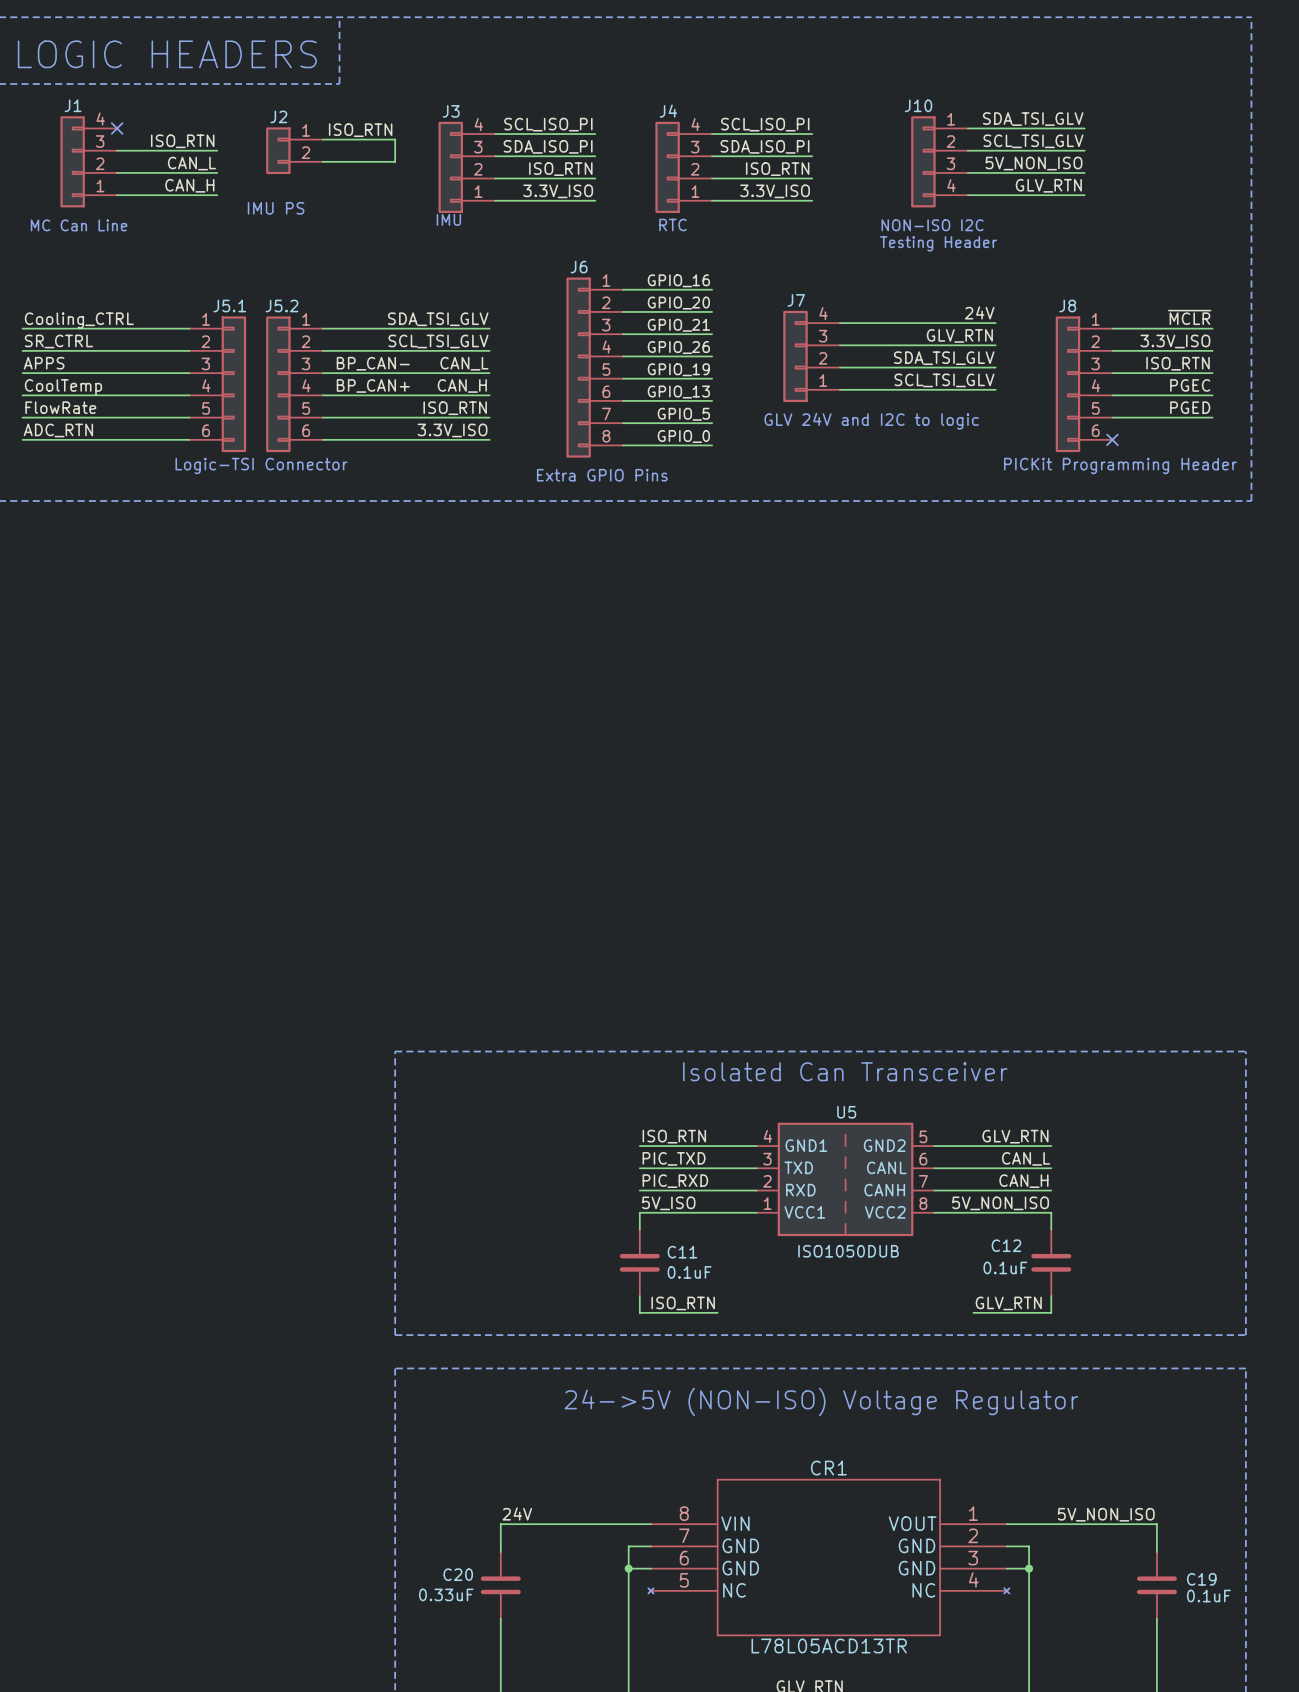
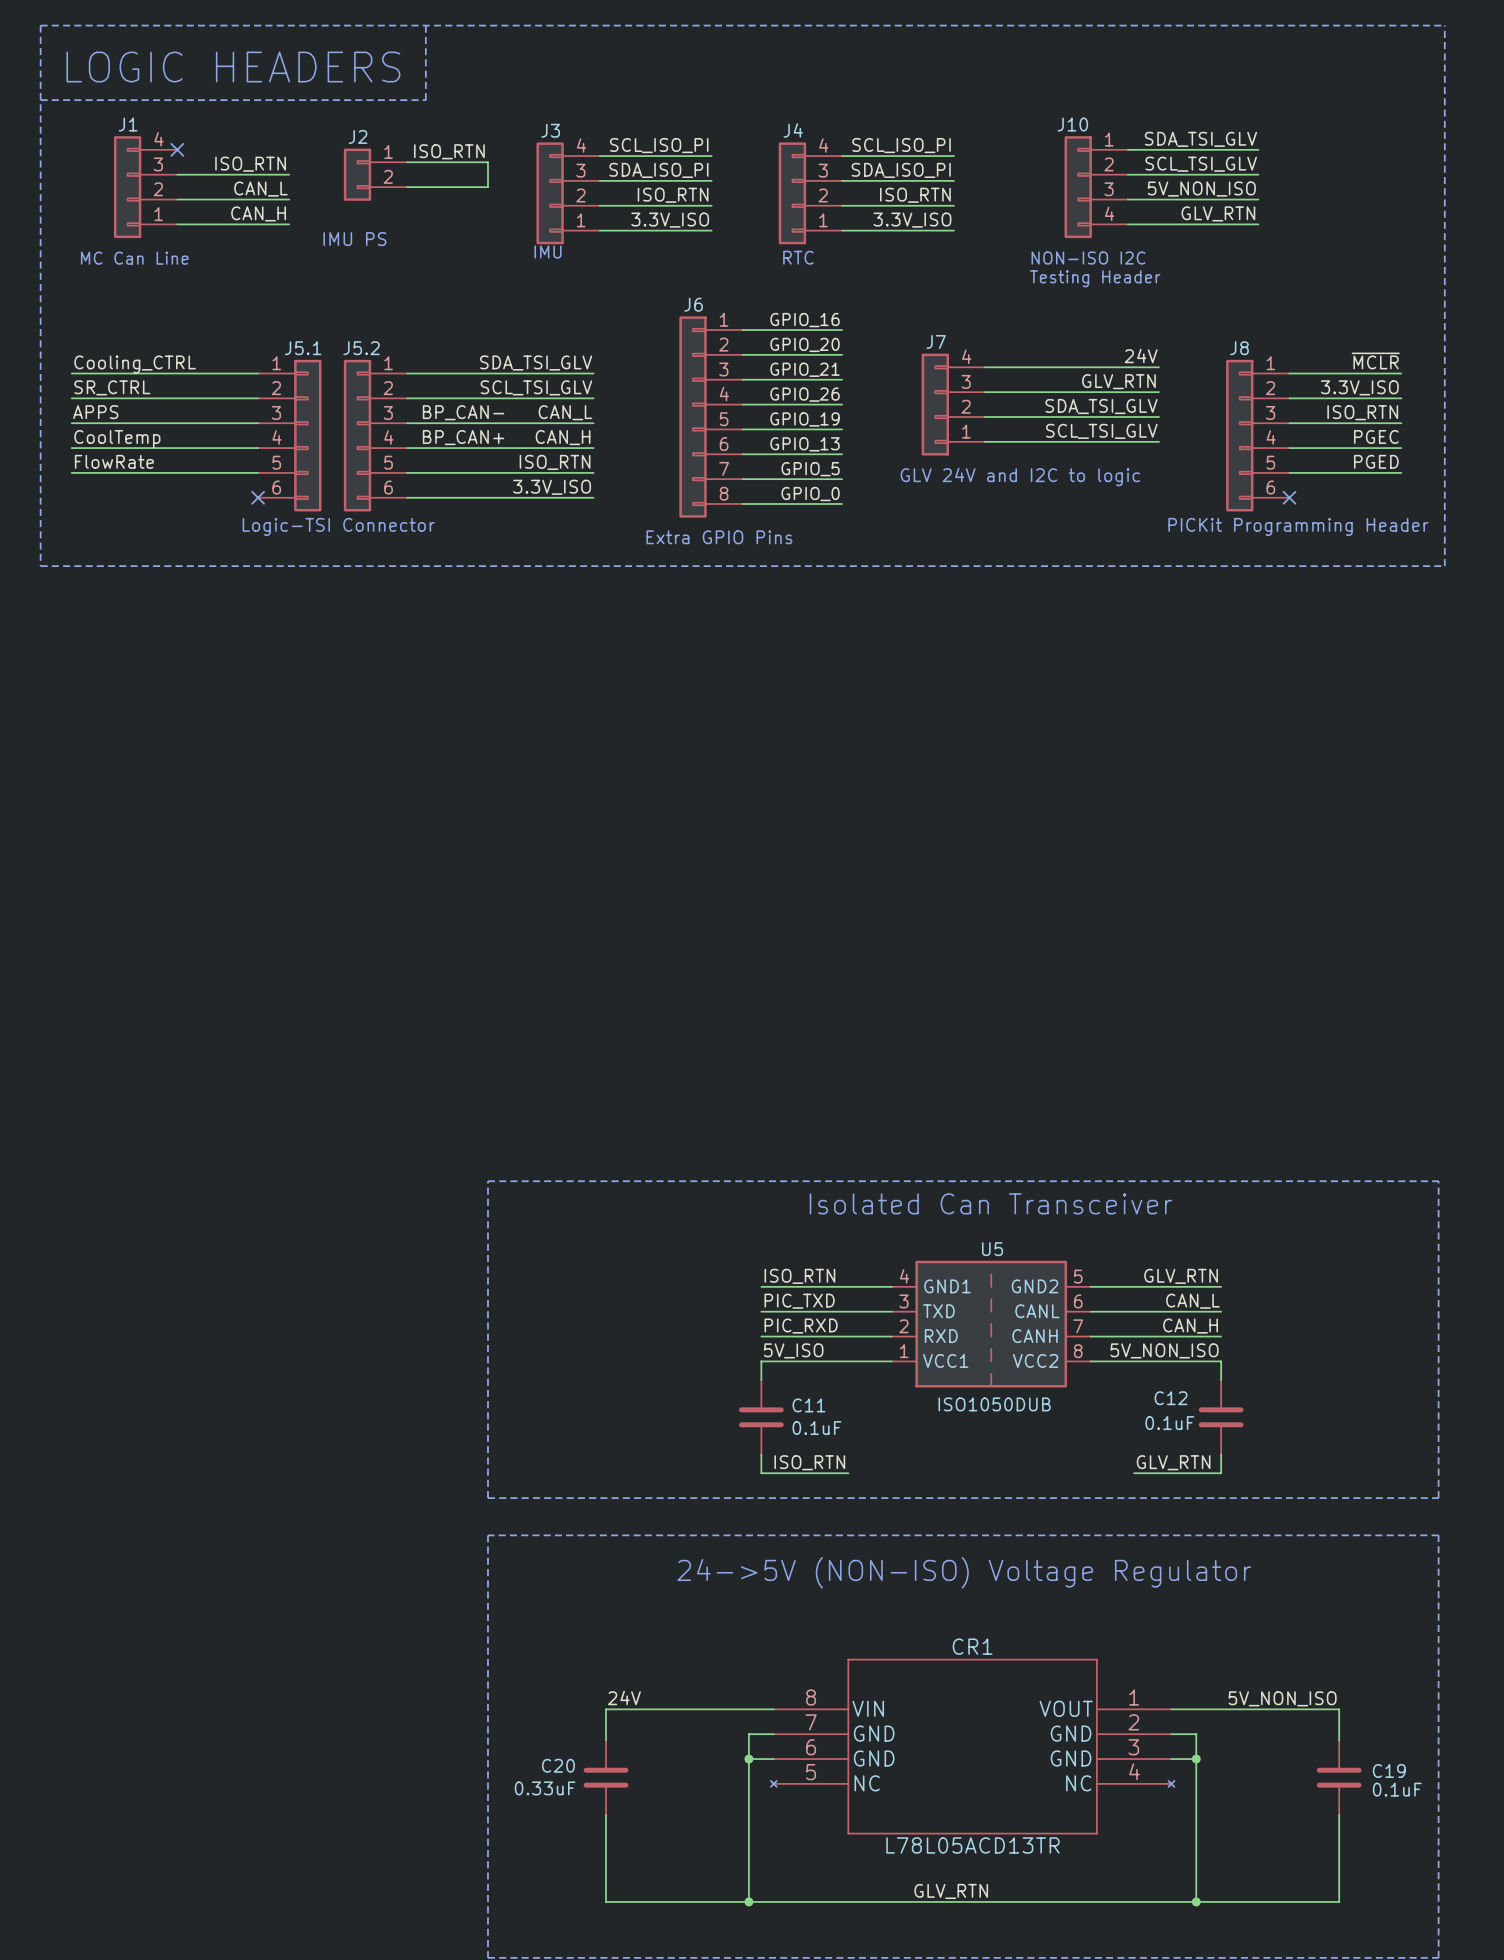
label: ADC_RTN (58, 430) -> none
wire: (22, 439) (189, 439) -> none
no-connect mark: none -> (258, 497)

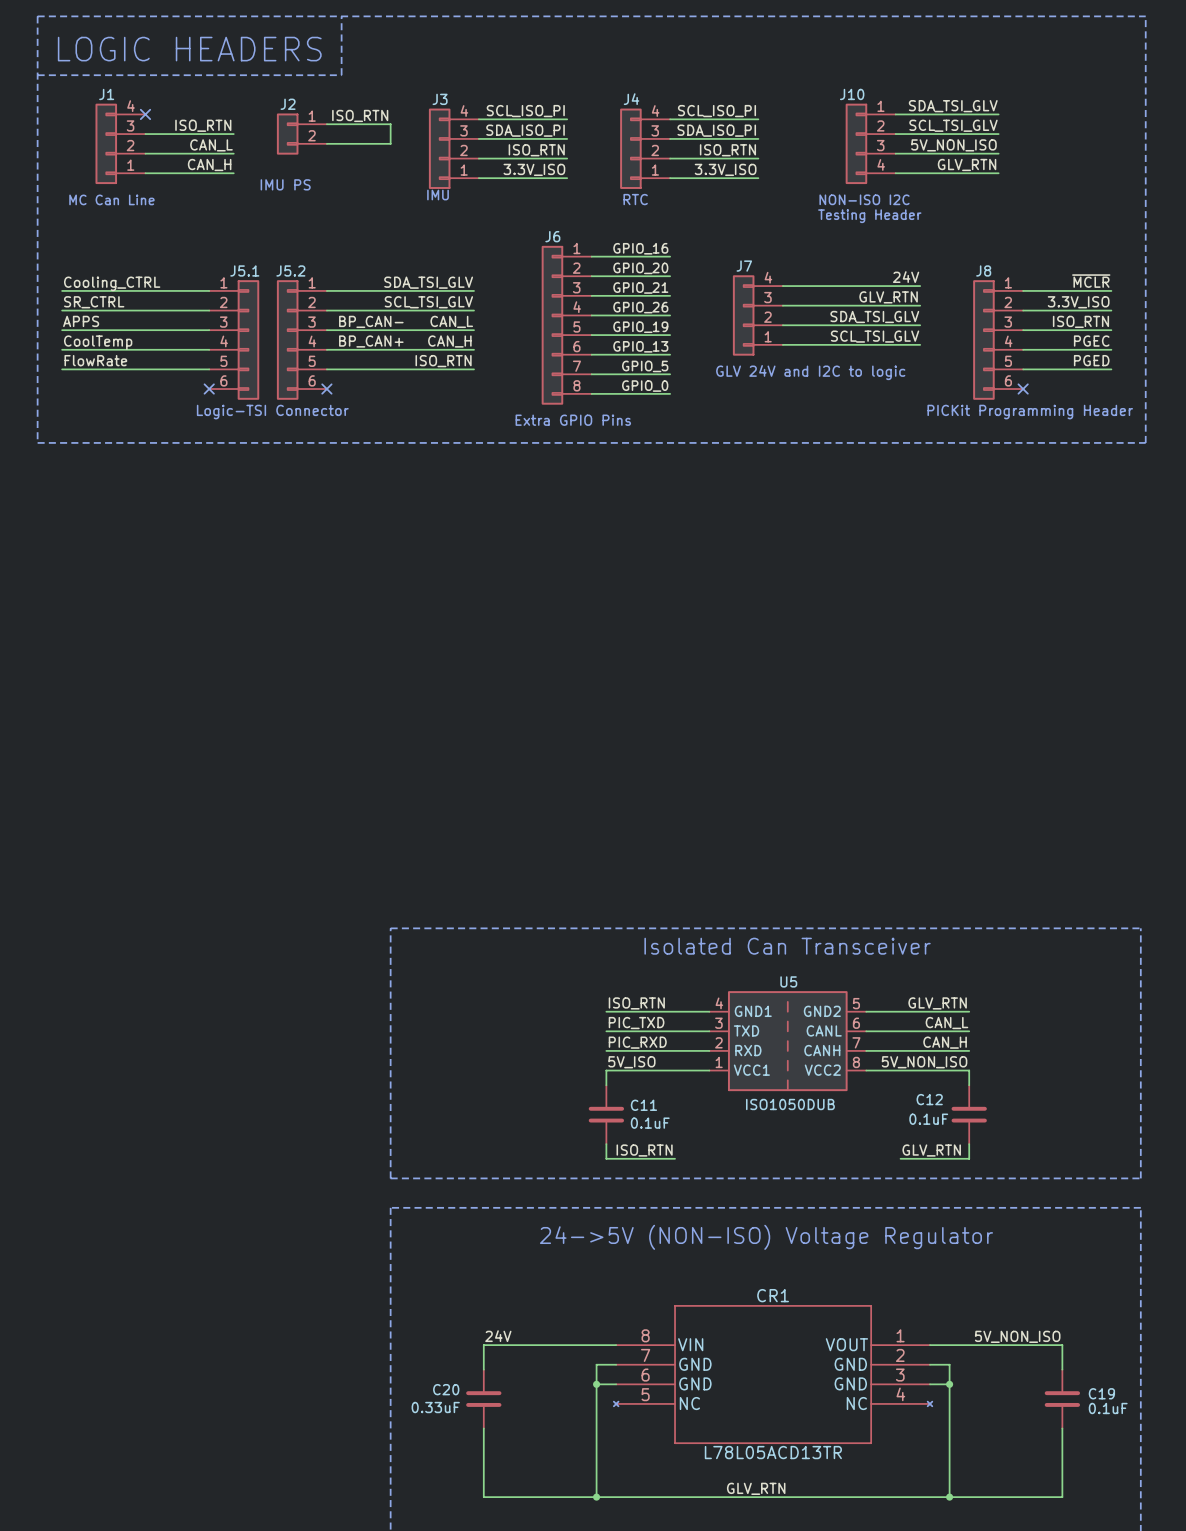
label: 3.3V_ISO (552, 487) -> none
wire: (407, 497) (593, 497) -> none
no-connect mark: none -> (326, 389)

